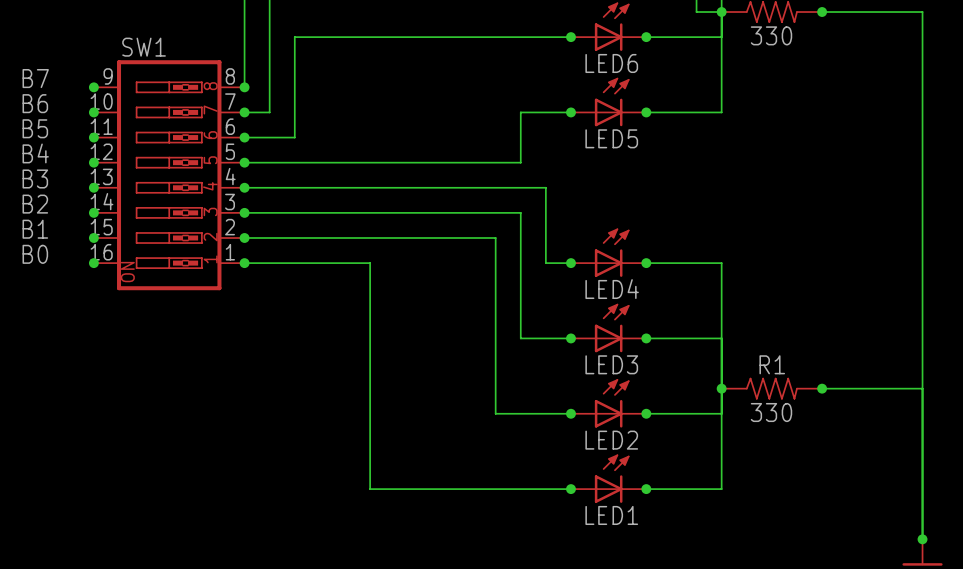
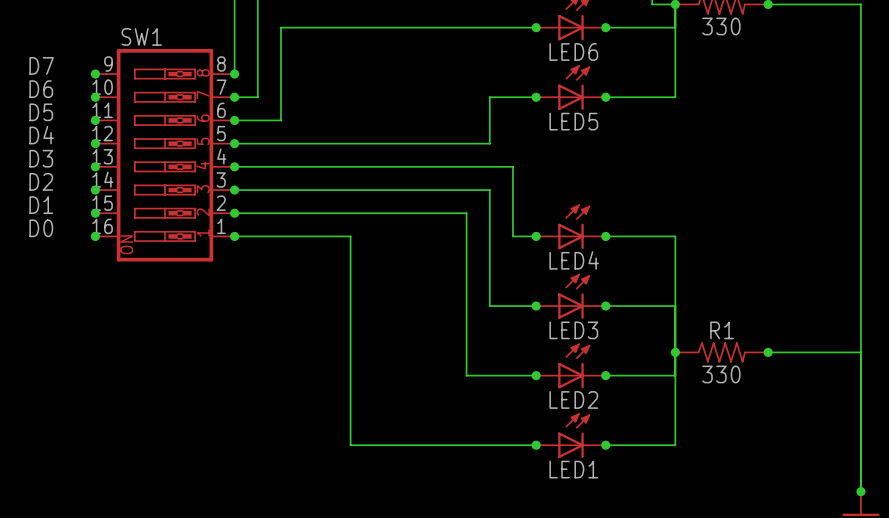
label: B7 (35, 78) -> D7 (41, 65)
label: B6 (35, 103) -> D6 (41, 89)
label: B5 (35, 128) -> D5 (41, 112)
label: B4 (35, 153) -> D4 (41, 135)
label: B3 (35, 178) -> D3 (41, 158)
label: B2 (35, 204) -> D2 (41, 181)
label: B1 (35, 229) -> D1 (41, 205)
label: B0 (35, 254) -> D0 (41, 228)

